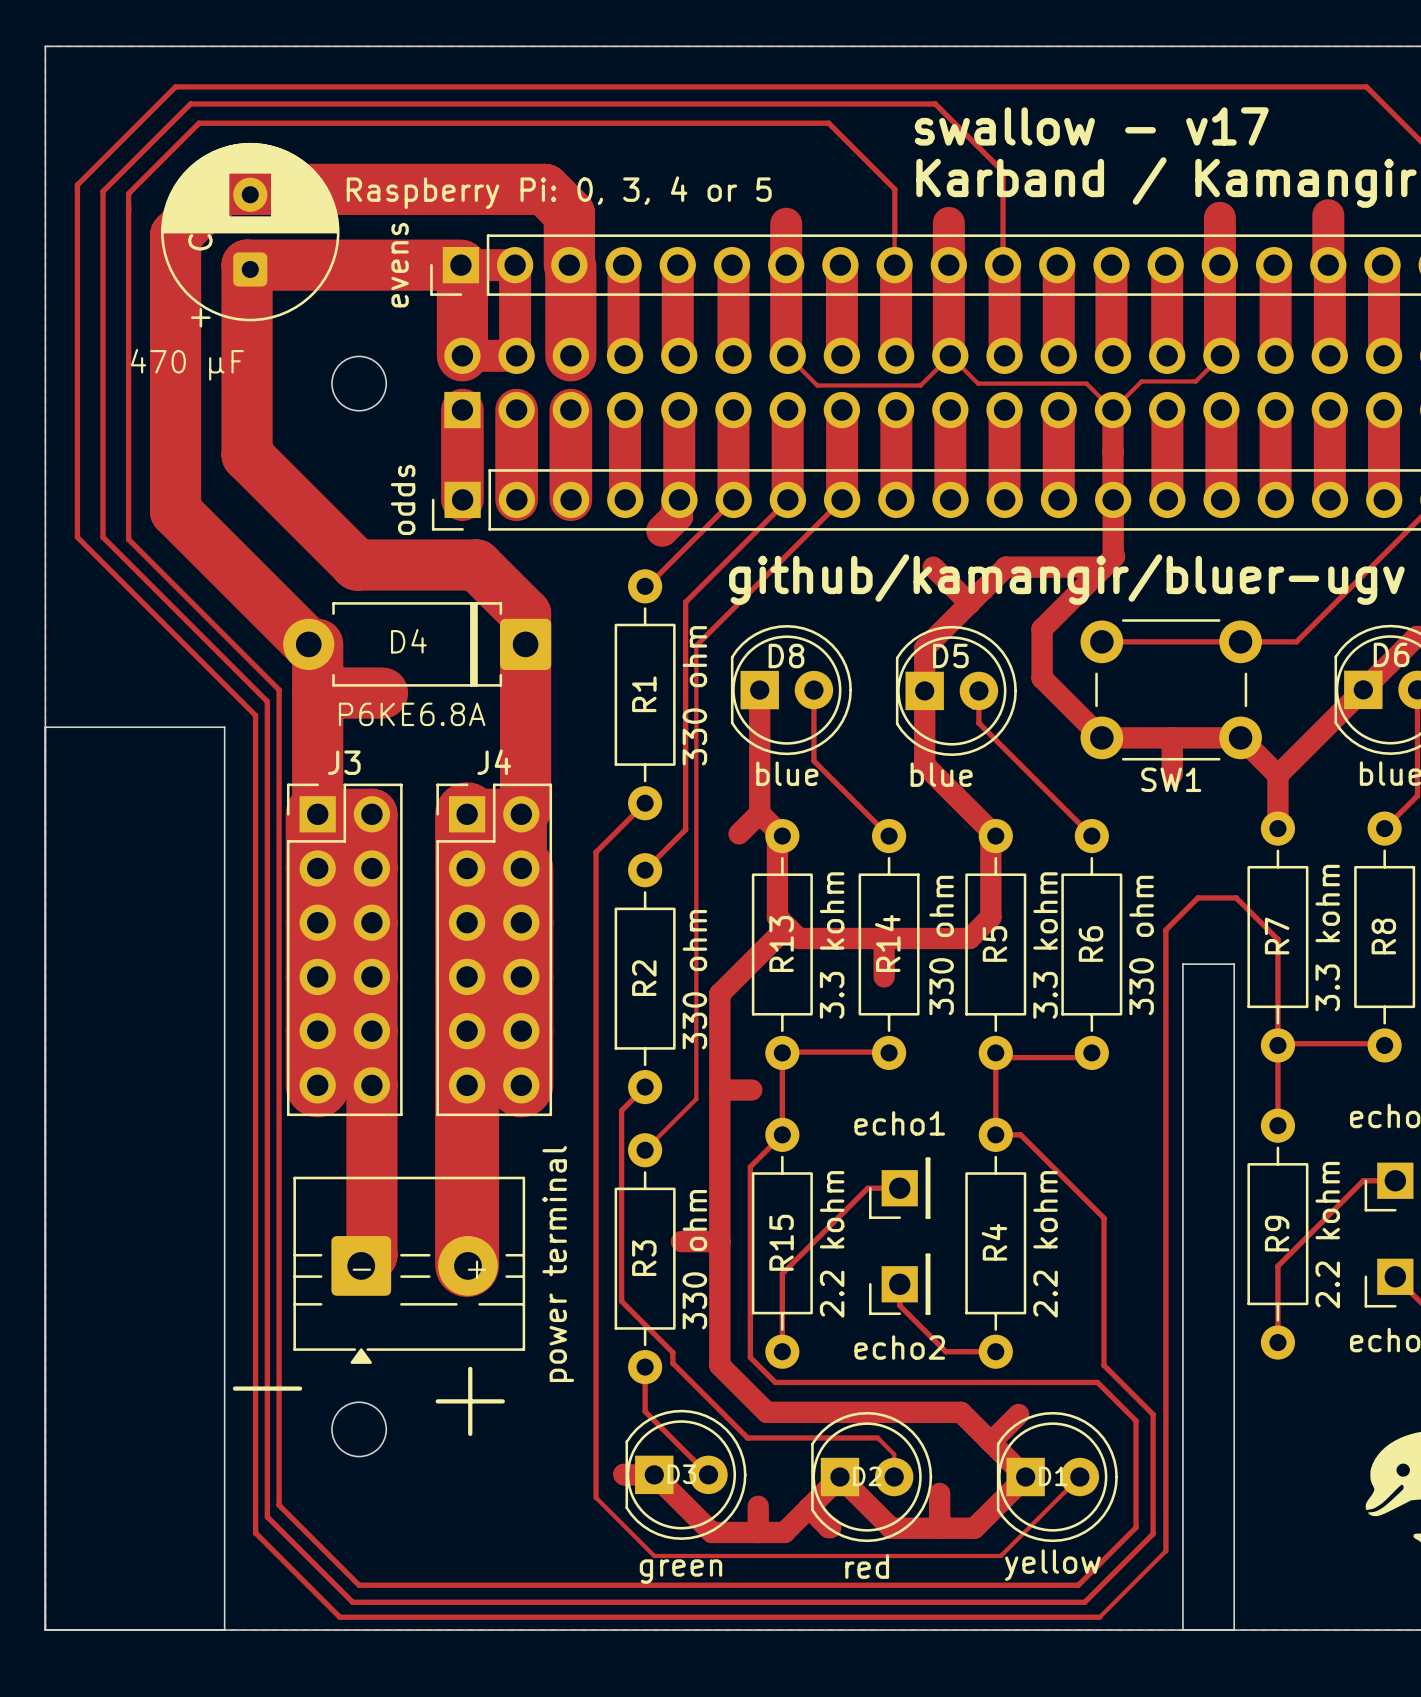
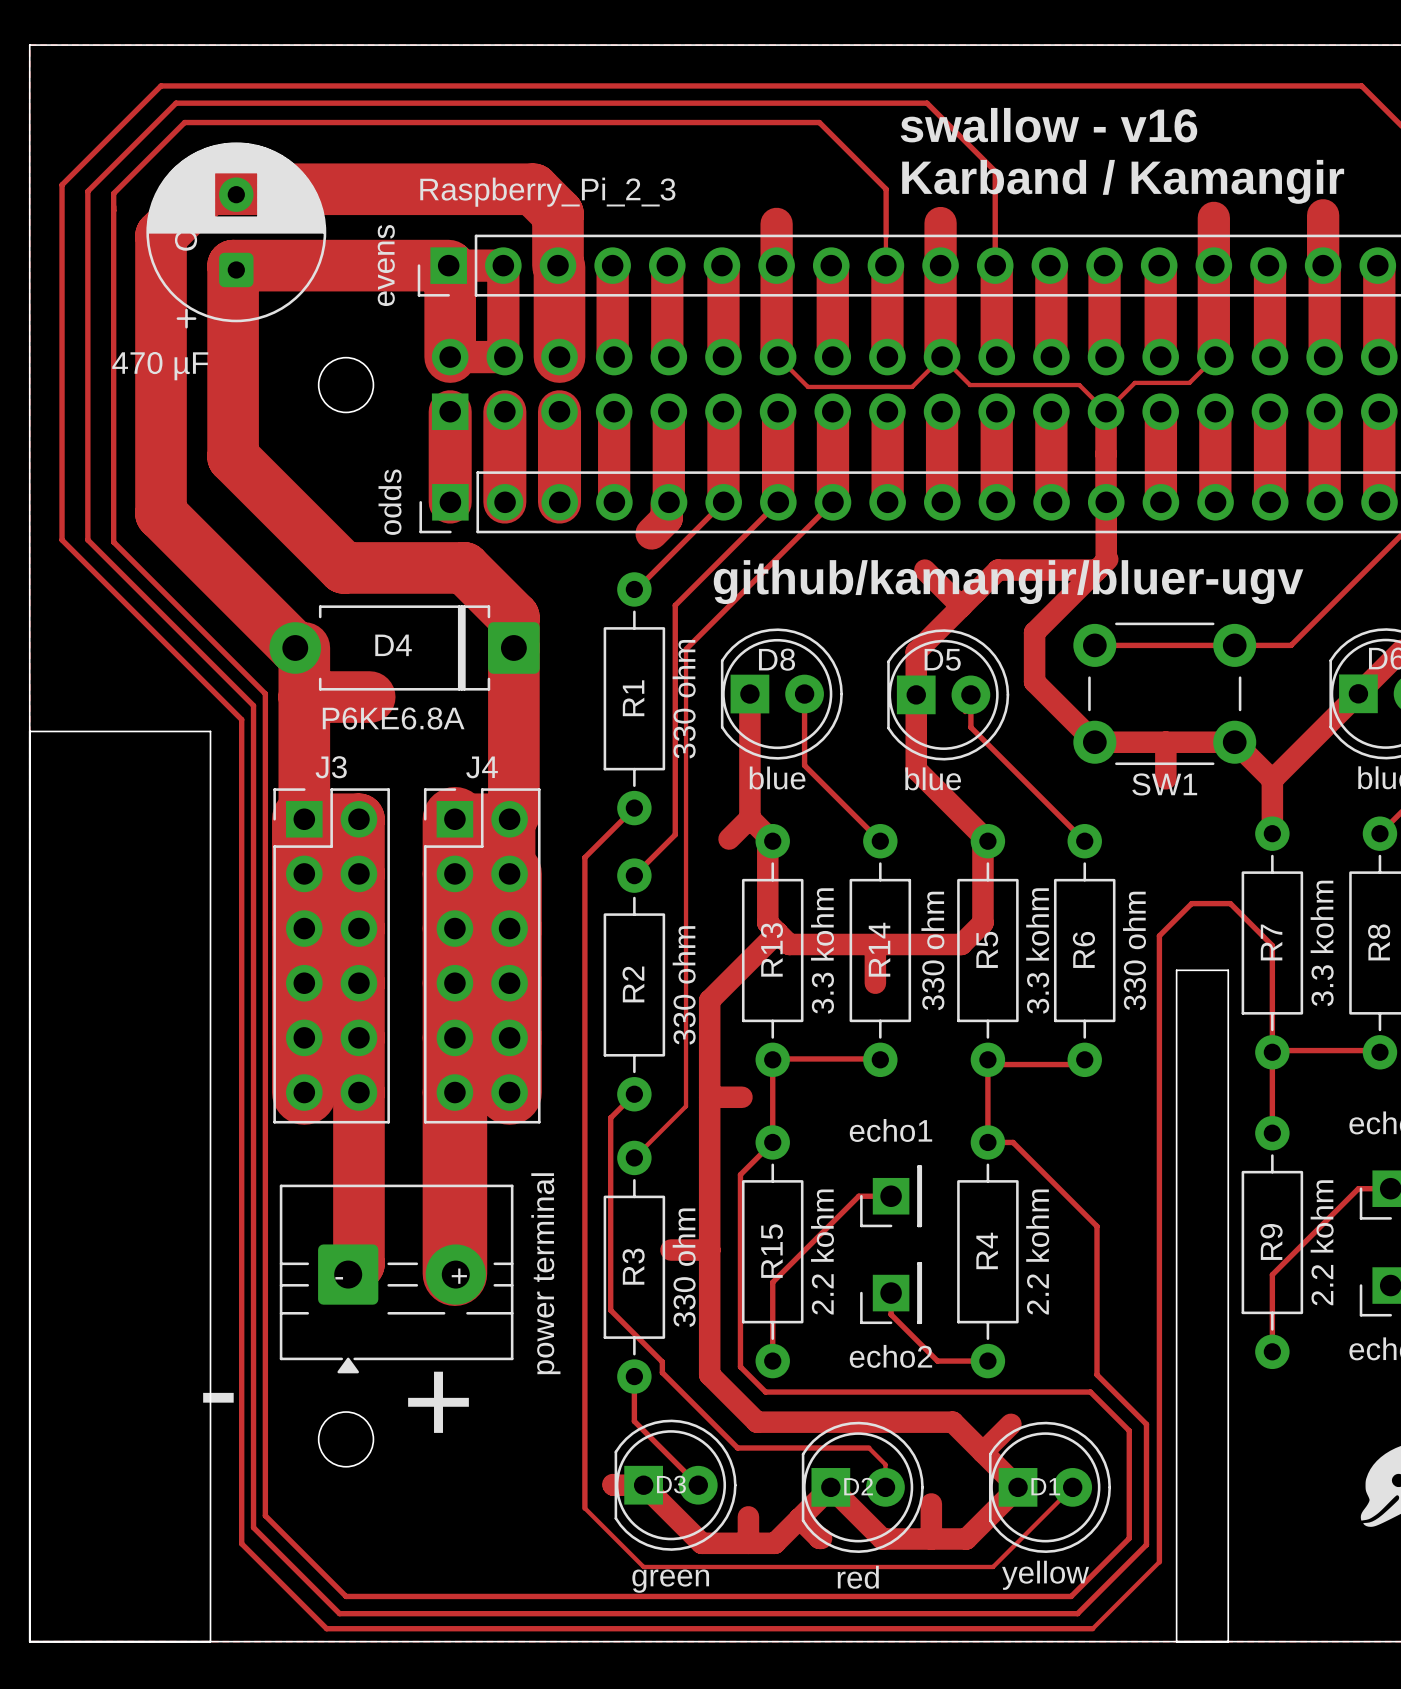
text: swallow - v17 (1091, 126) -> swallow - v16 (1048, 125)
part value: Raspberry Pi: 0, 3, 4 or 5 (559, 192) -> Raspberry_Pi_2_3 (547, 192)

